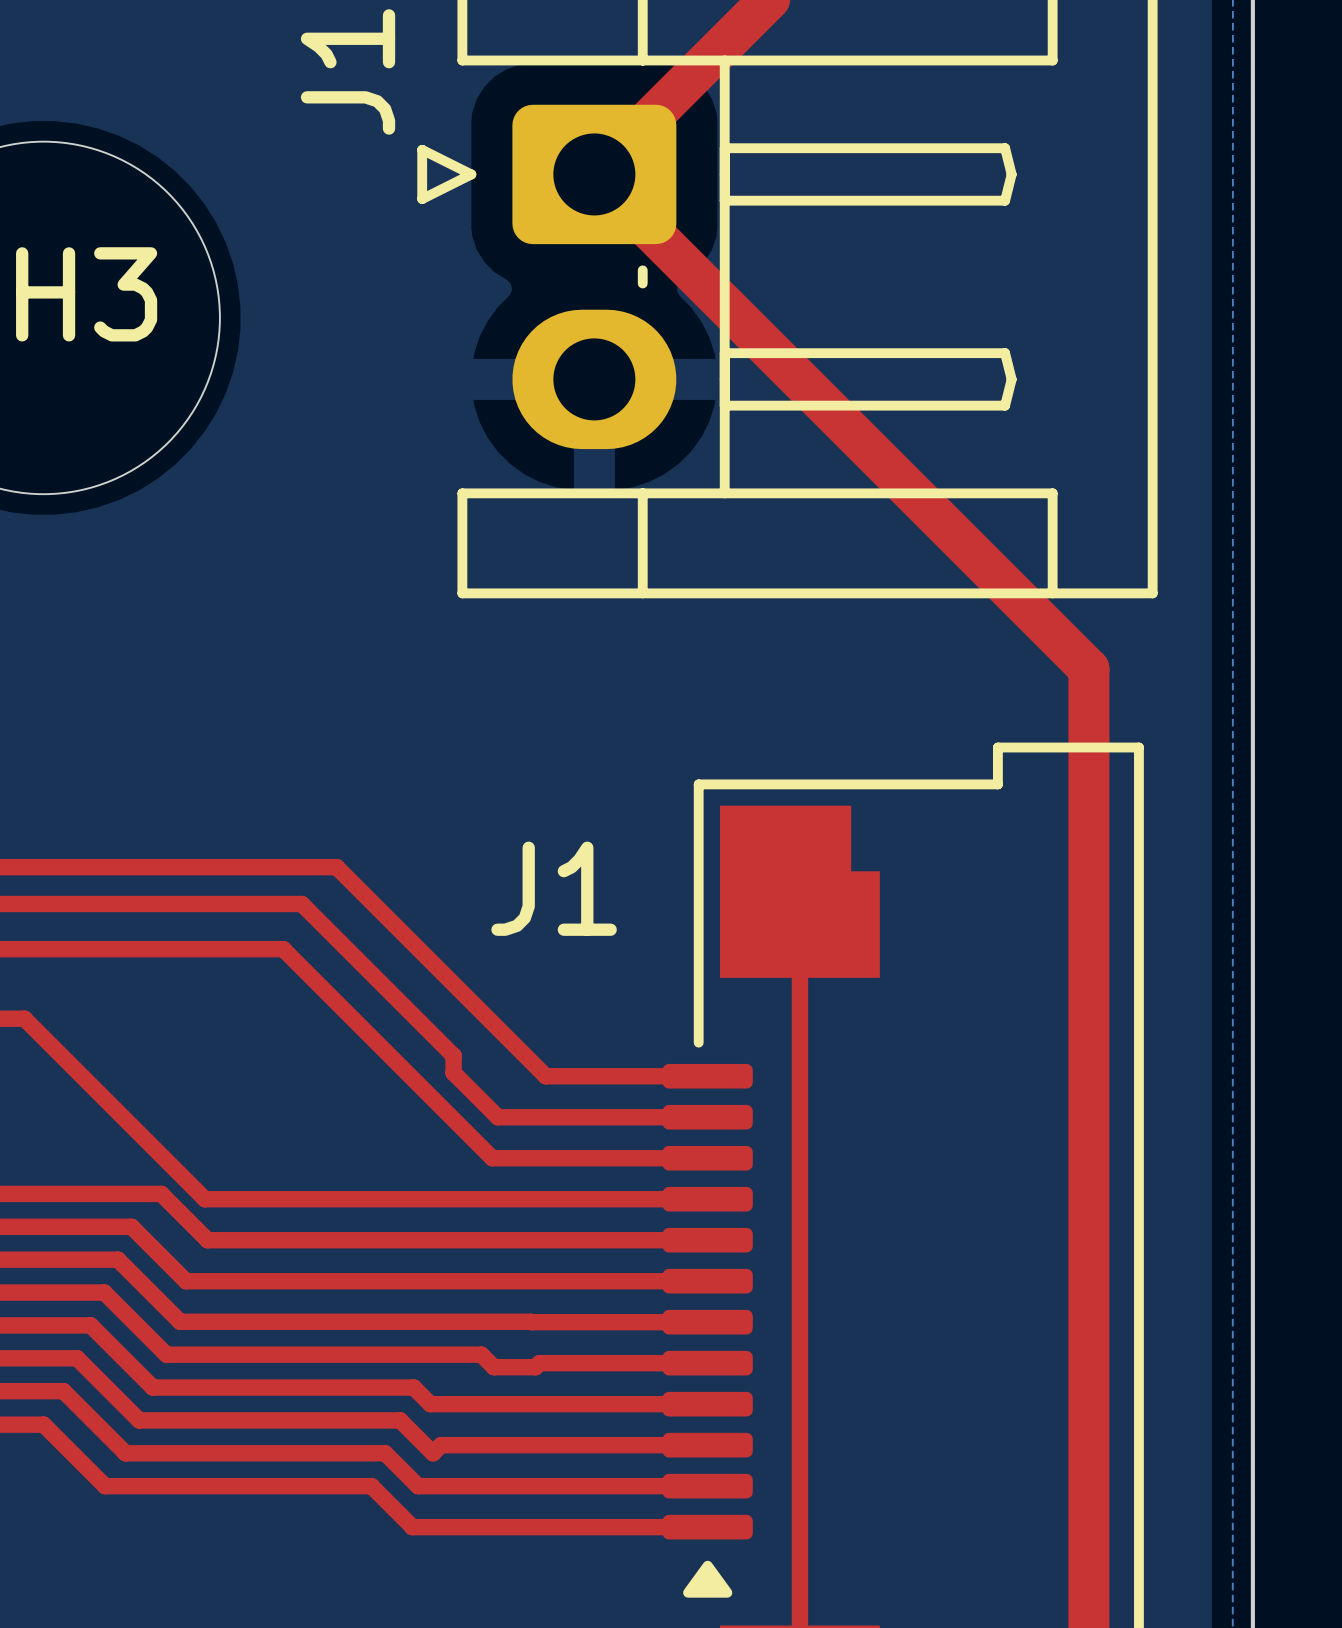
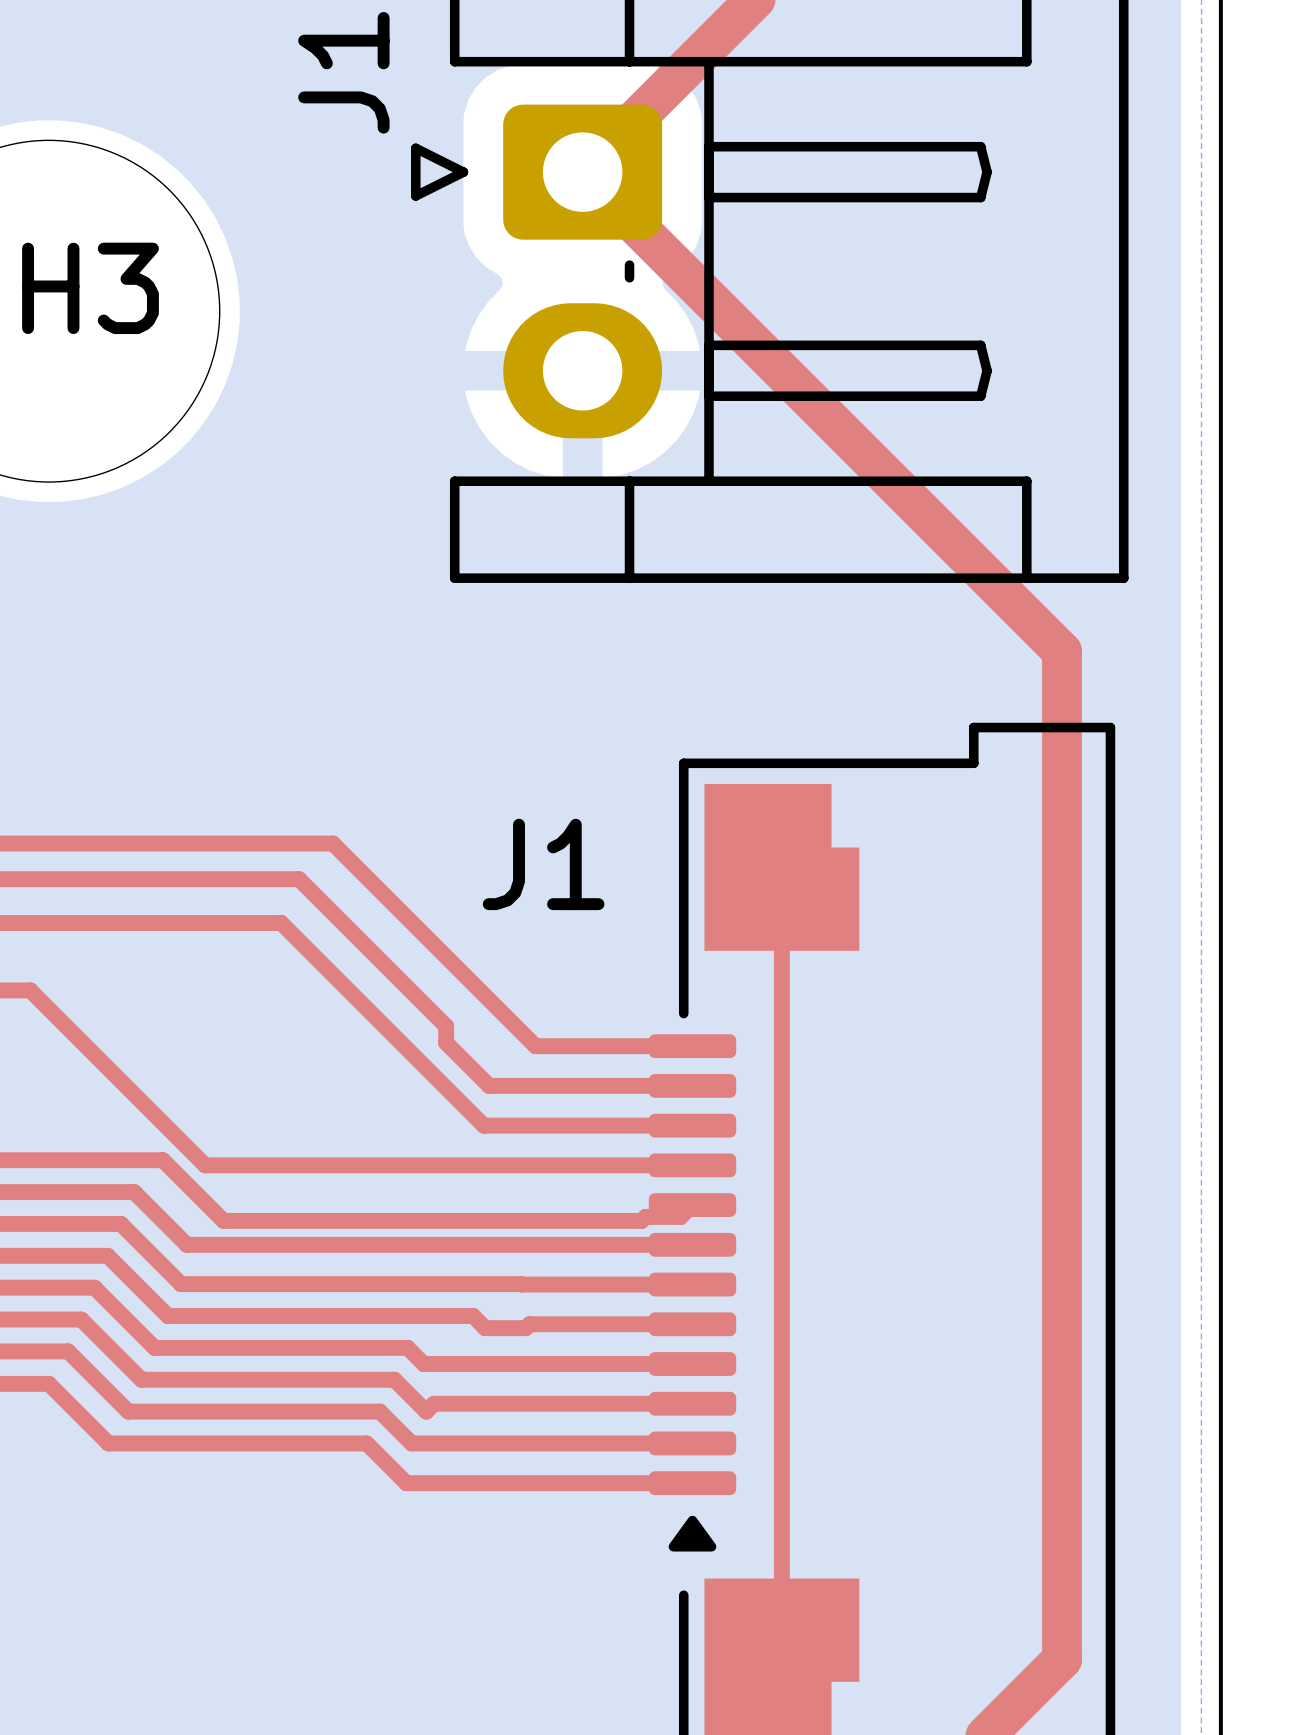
top track: (207, 1240) (707, 1240) -> (207, 1205) (223, 1220) (641, 1220) (645, 1216) (680, 1216) (692, 1205)

